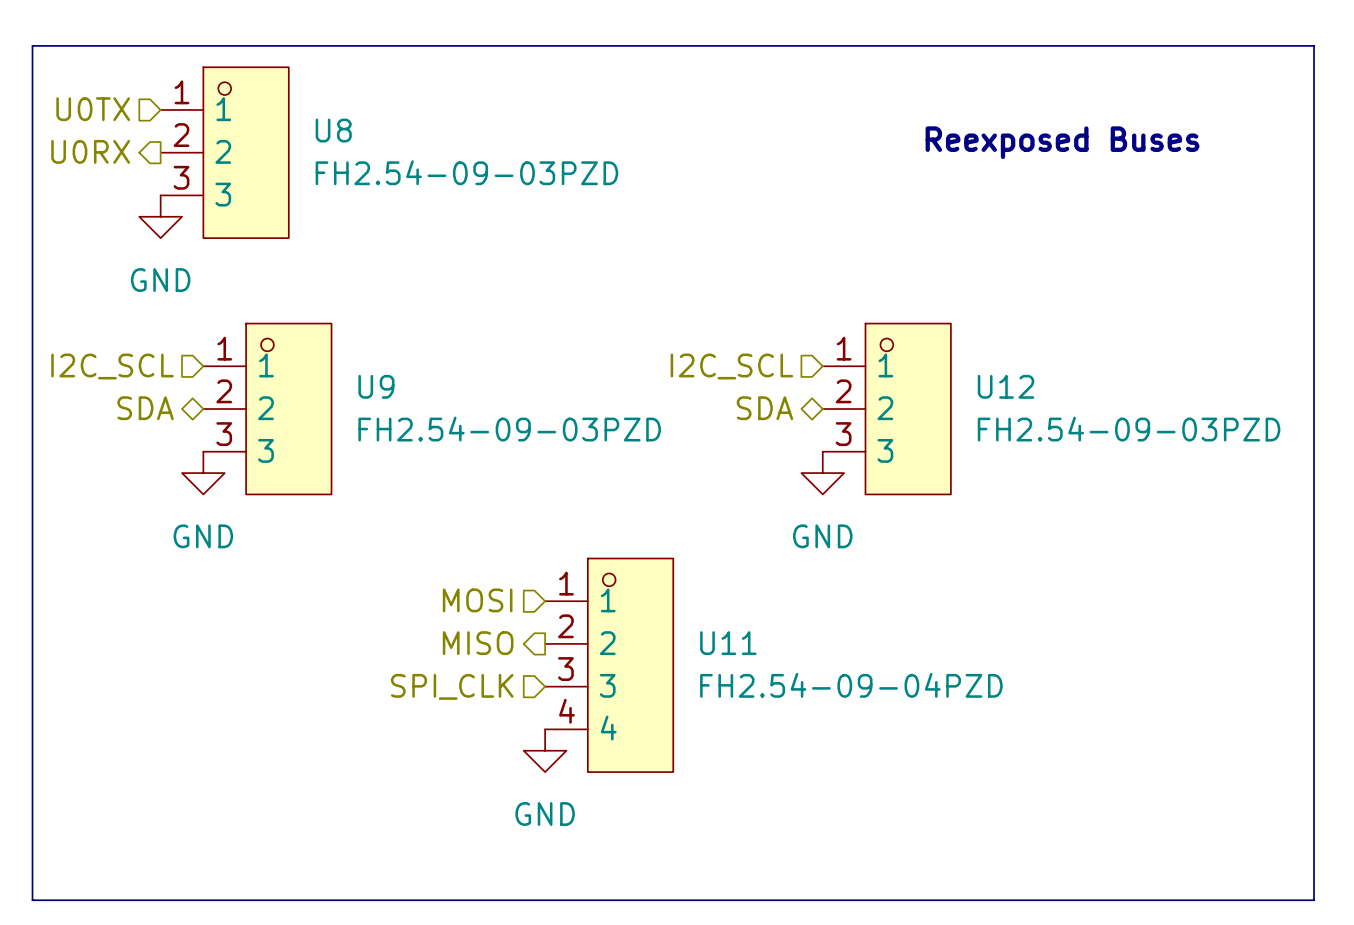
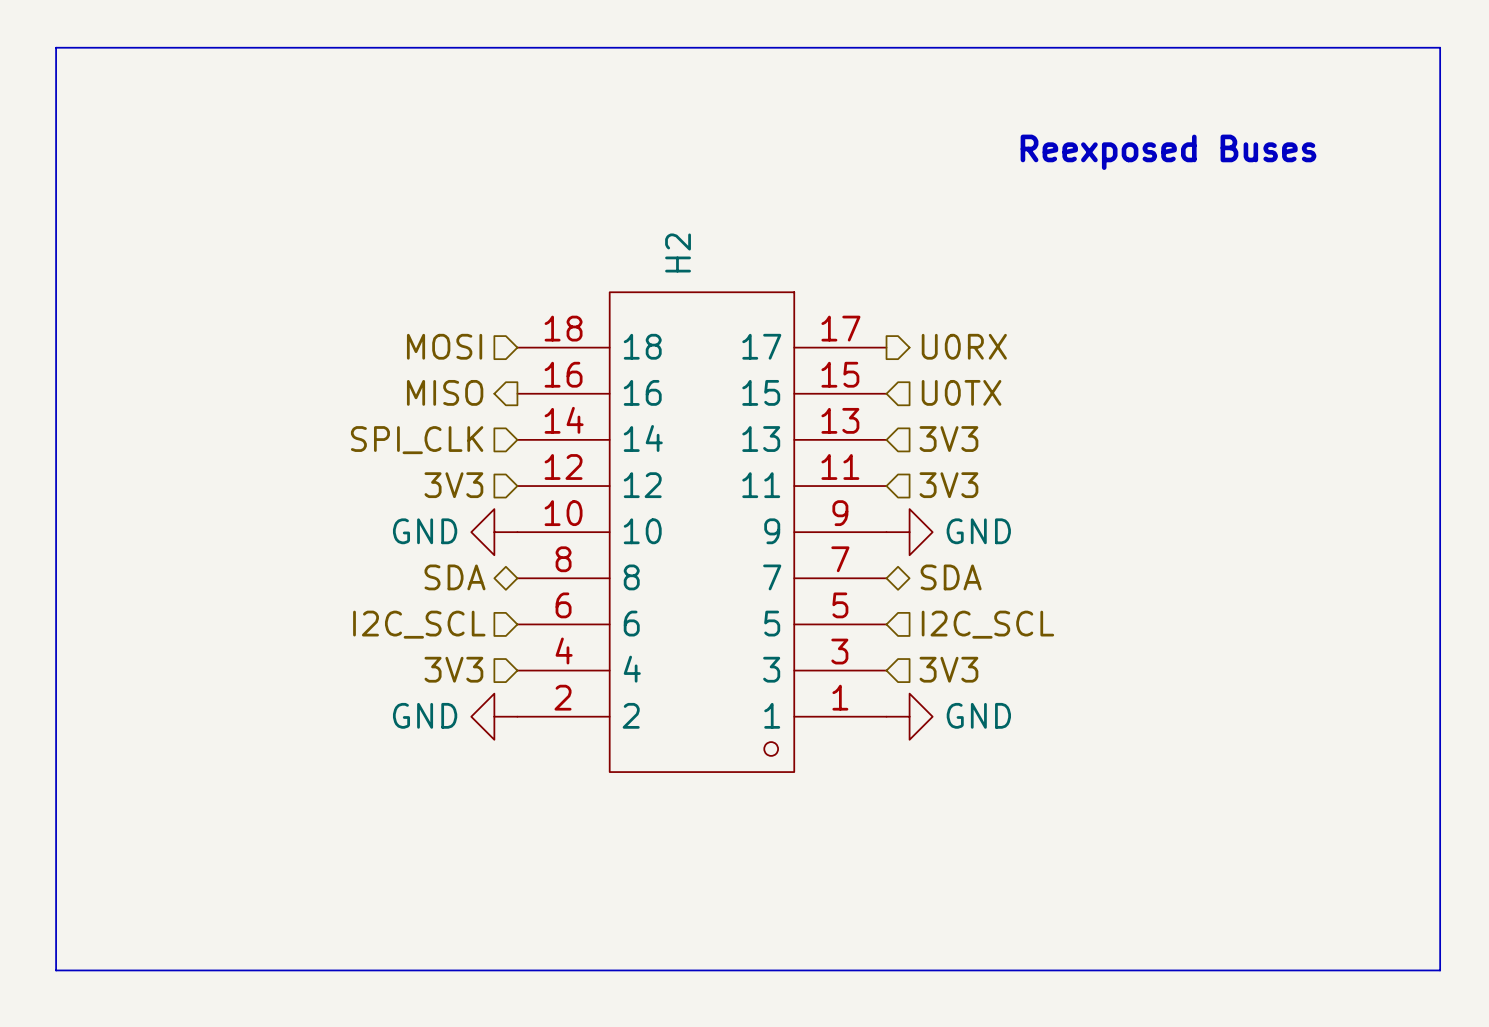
hierarchical label: U0TX (93, 109) -> none
hierarchical label: U0RX (90, 151) -> none
U8: FH2.54-09-03PZD (224, 152) -> none
power symbol: GND (160, 216) -> none
hierarchical label: none -> U0RX (964, 346)
hierarchical label: none -> U0TX (961, 392)
hierarchical label: I2C_SCL (112, 366) -> none
hierarchical label: I2C_SCL (731, 366) -> none
hierarchical label: SDA (145, 408) -> none
U9: FH2.54-09-03PZD (267, 408) -> none
hierarchical label rotation: 0° (764, 408) -> 180° (951, 577)
hierarchical label position: SDA (764, 408) -> SDA (951, 577)
hierarchical label: none -> 3V3 (948, 439)
U12: FH2.54-09-03PZD (886, 408) -> none
hierarchical label: none -> 3V3 (453, 485)
hierarchical label: none -> 3V3 (948, 485)
power symbol: GND (203, 473) -> none
power symbol rotation: 0° (822, 473) -> 90° counterclockwise (909, 532)
power symbol: none -> GND (494, 532)
H2: none -> (701, 532)
hierarchical label: none -> SDA (455, 577)
hierarchical label: none -> I2C_SCL (419, 624)
hierarchical label: none -> I2C_SCL (987, 624)
hierarchical label position: MOSI (477, 600) -> MOSI (444, 346)
hierarchical label: none -> 3V3 (453, 669)
hierarchical label: none -> 3V3 (948, 669)
hierarchical label position: MISO (478, 643) -> MISO (445, 392)
U11: FH2.54-09-04PZD (609, 665) -> none
power symbol: none -> GND (909, 716)
hierarchical label position: SPI_CLK (452, 686) -> SPI_CLK (417, 440)
power symbol rotation: 0° (545, 750) -> 90° clockwise (494, 716)
power symbol position: GND (545, 750) -> GND (494, 716)

